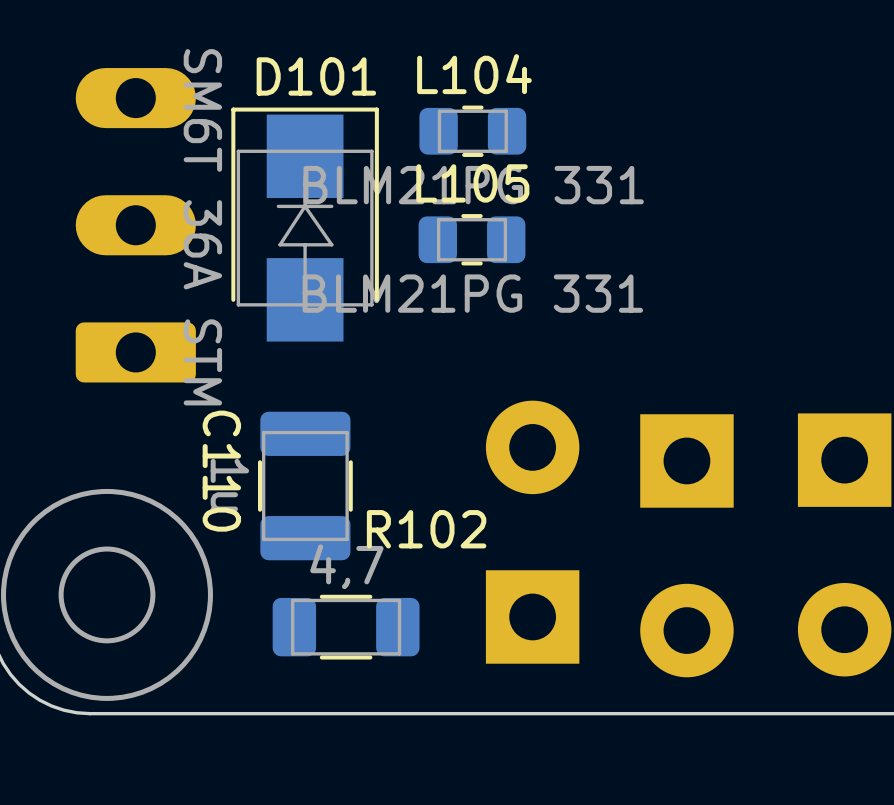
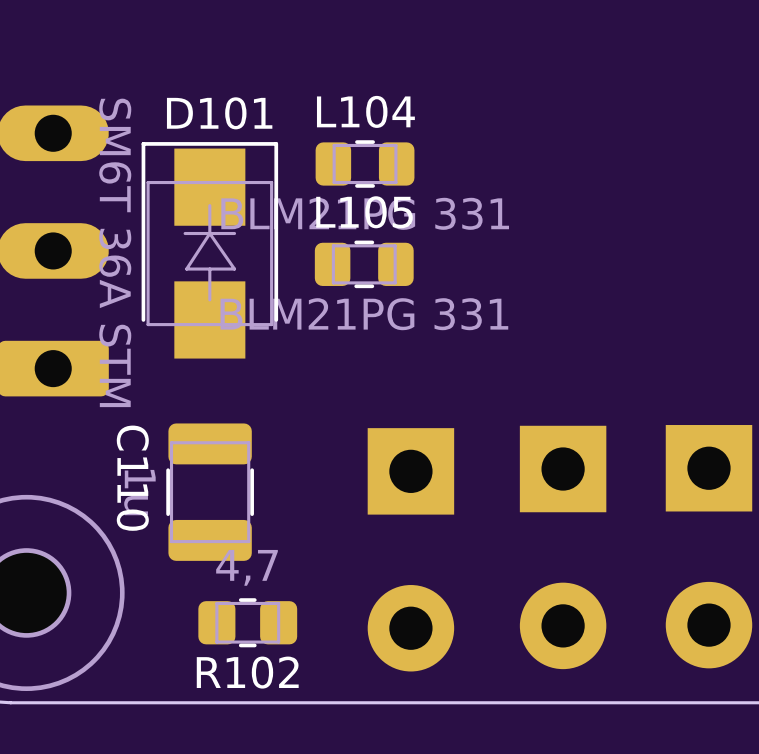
R102 name position: R102 (426, 529) -> R102 (247, 672)
part rotation: 0° (532, 532) -> 180° (410, 549)
R102 footprint: [272, 594, 420, 660] -> [198, 598, 298, 648]

